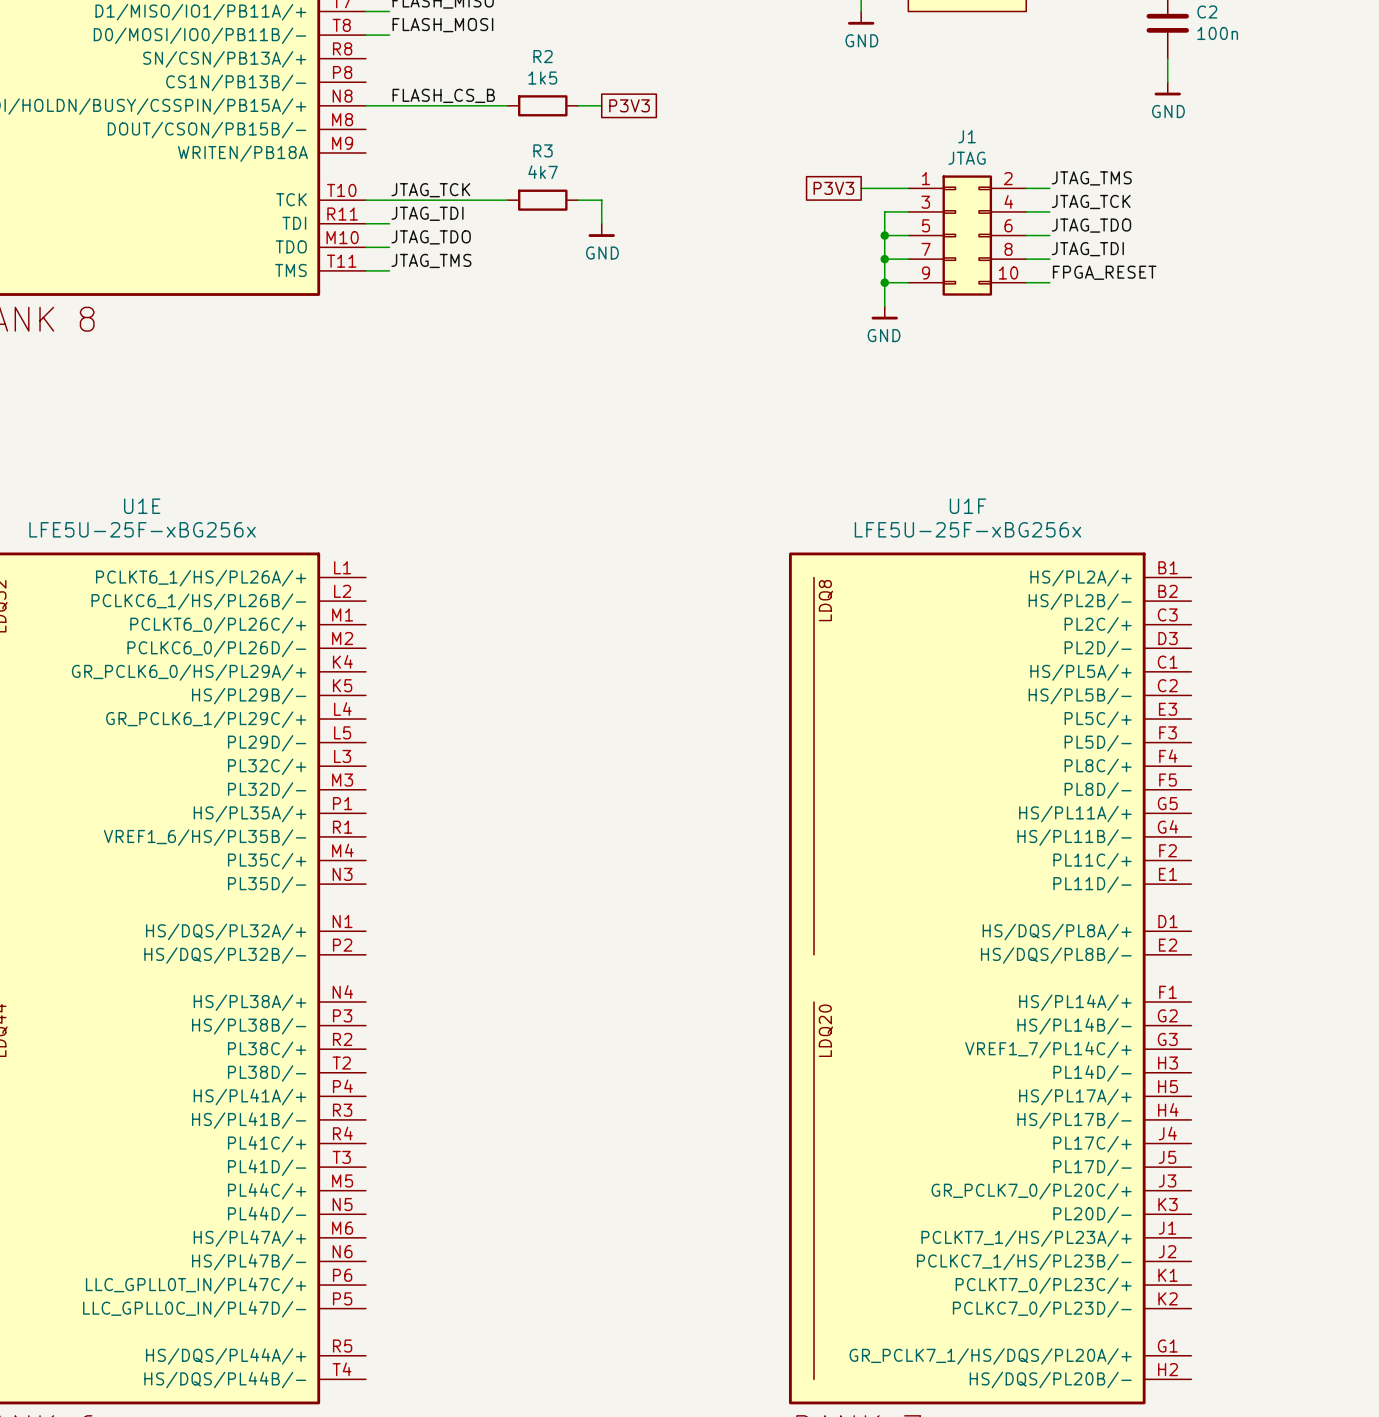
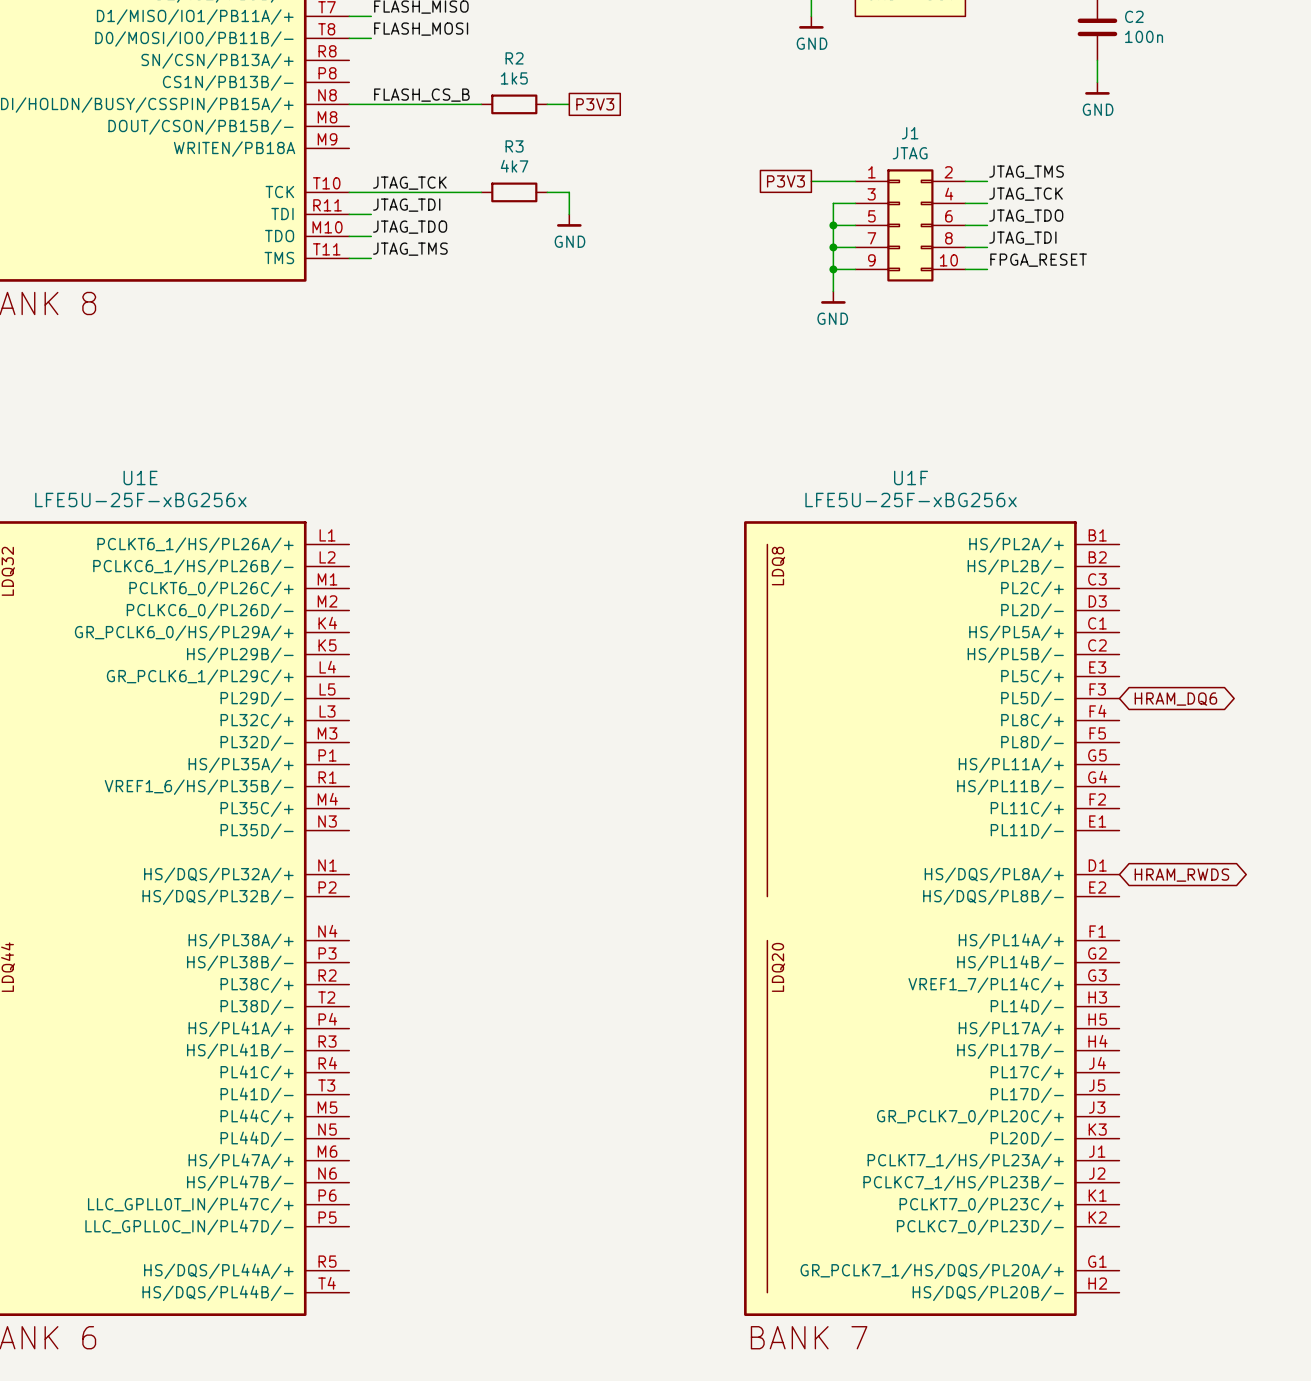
global label: none -> HRAM_DQ6 (1175, 699)
global label: none -> HRAM_RWDS (1181, 875)

